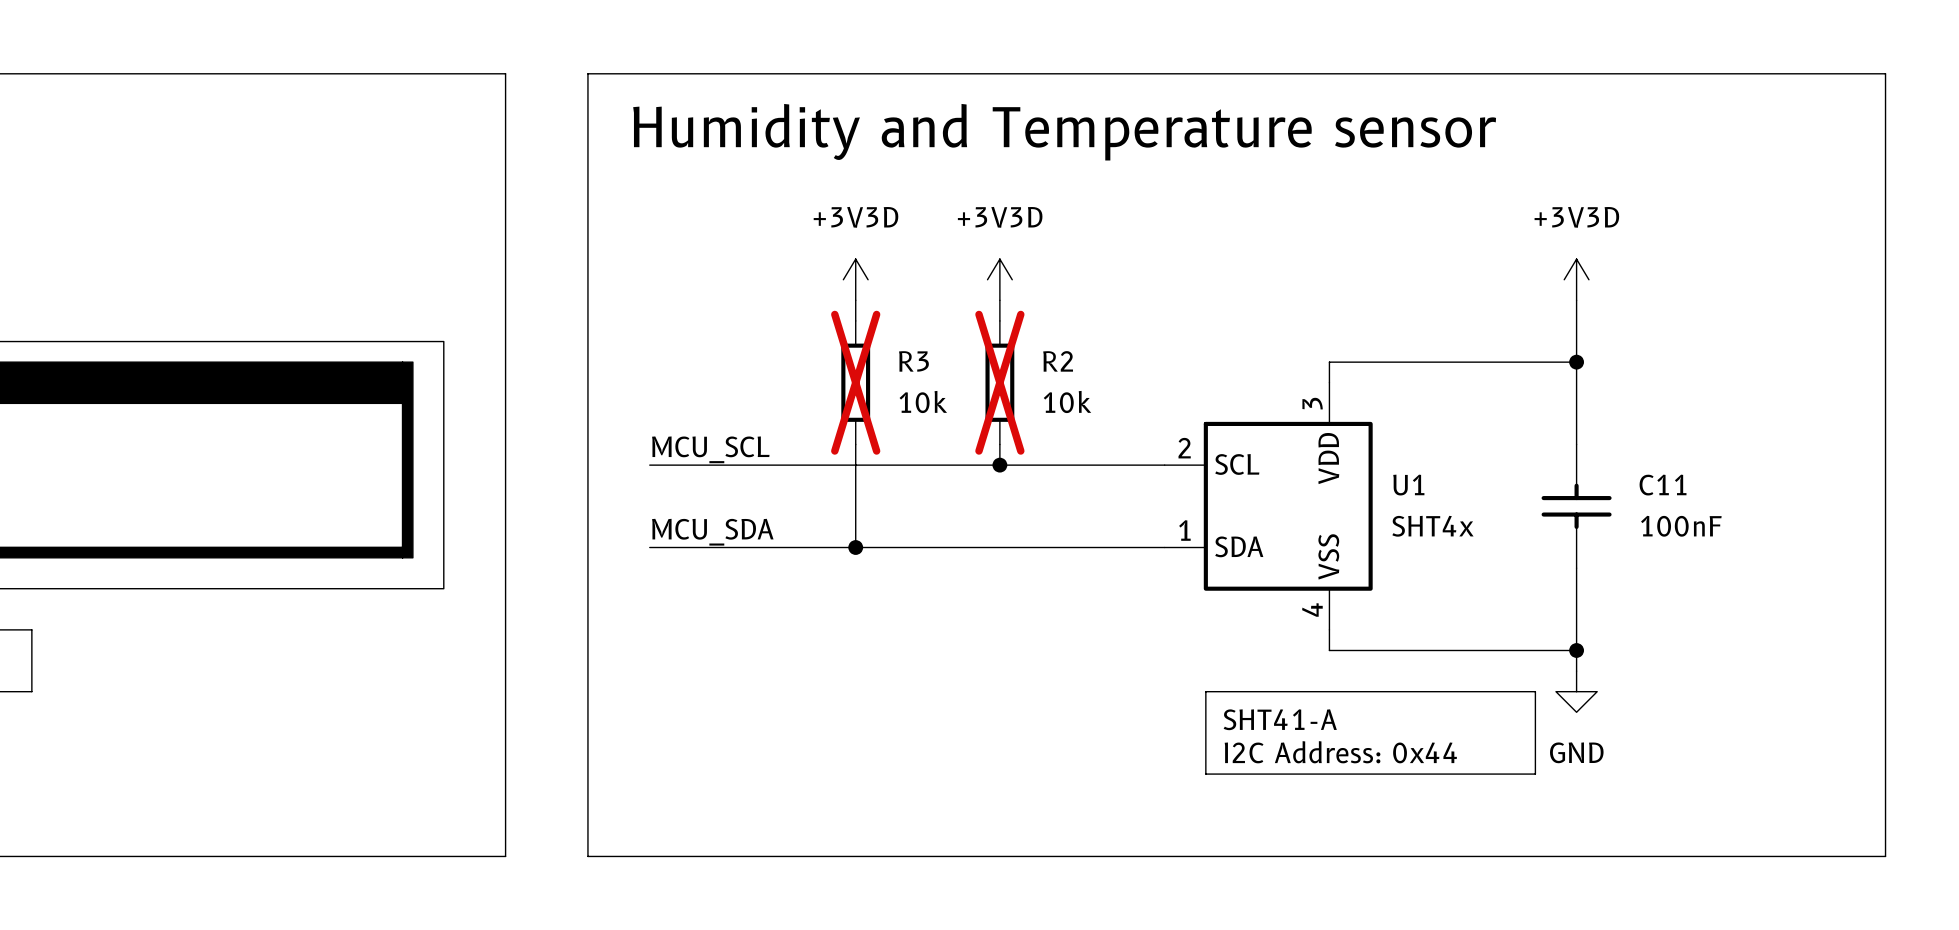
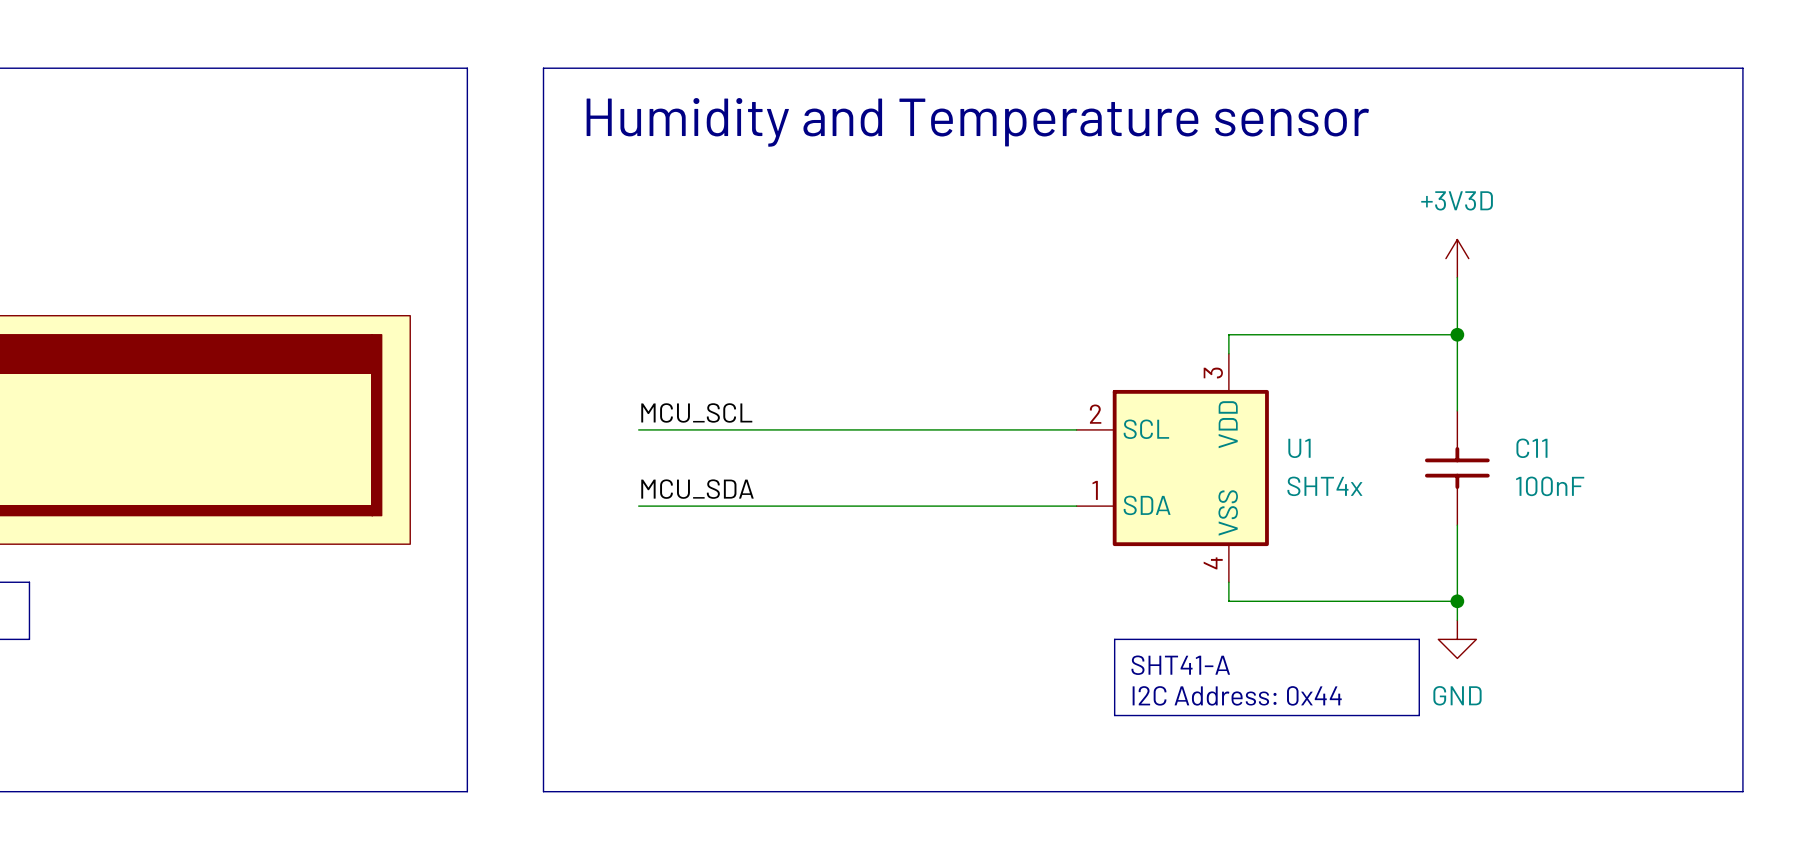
power symbol: +3V3D (855, 279) -> none
power symbol: +3V3D (999, 279) -> none
wire: (855, 300) (855, 320) -> none
wire: (999, 300) (999, 320) -> none
R3: (855, 382) -> none
R2: (999, 382) -> none
wire: (855, 444) (855, 547) -> none
wire: (999, 444) (999, 465) -> none
label position: MCU_SCL (710, 449) -> MCU_SCL (696, 412)
wire: (649, 465) (690, 465) -> none
junction: (999, 465) -> none
label position: MCU_SDA (712, 532) -> MCU_SDA (697, 489)
wire: (649, 547) (690, 547) -> none
junction: (855, 547) -> none

